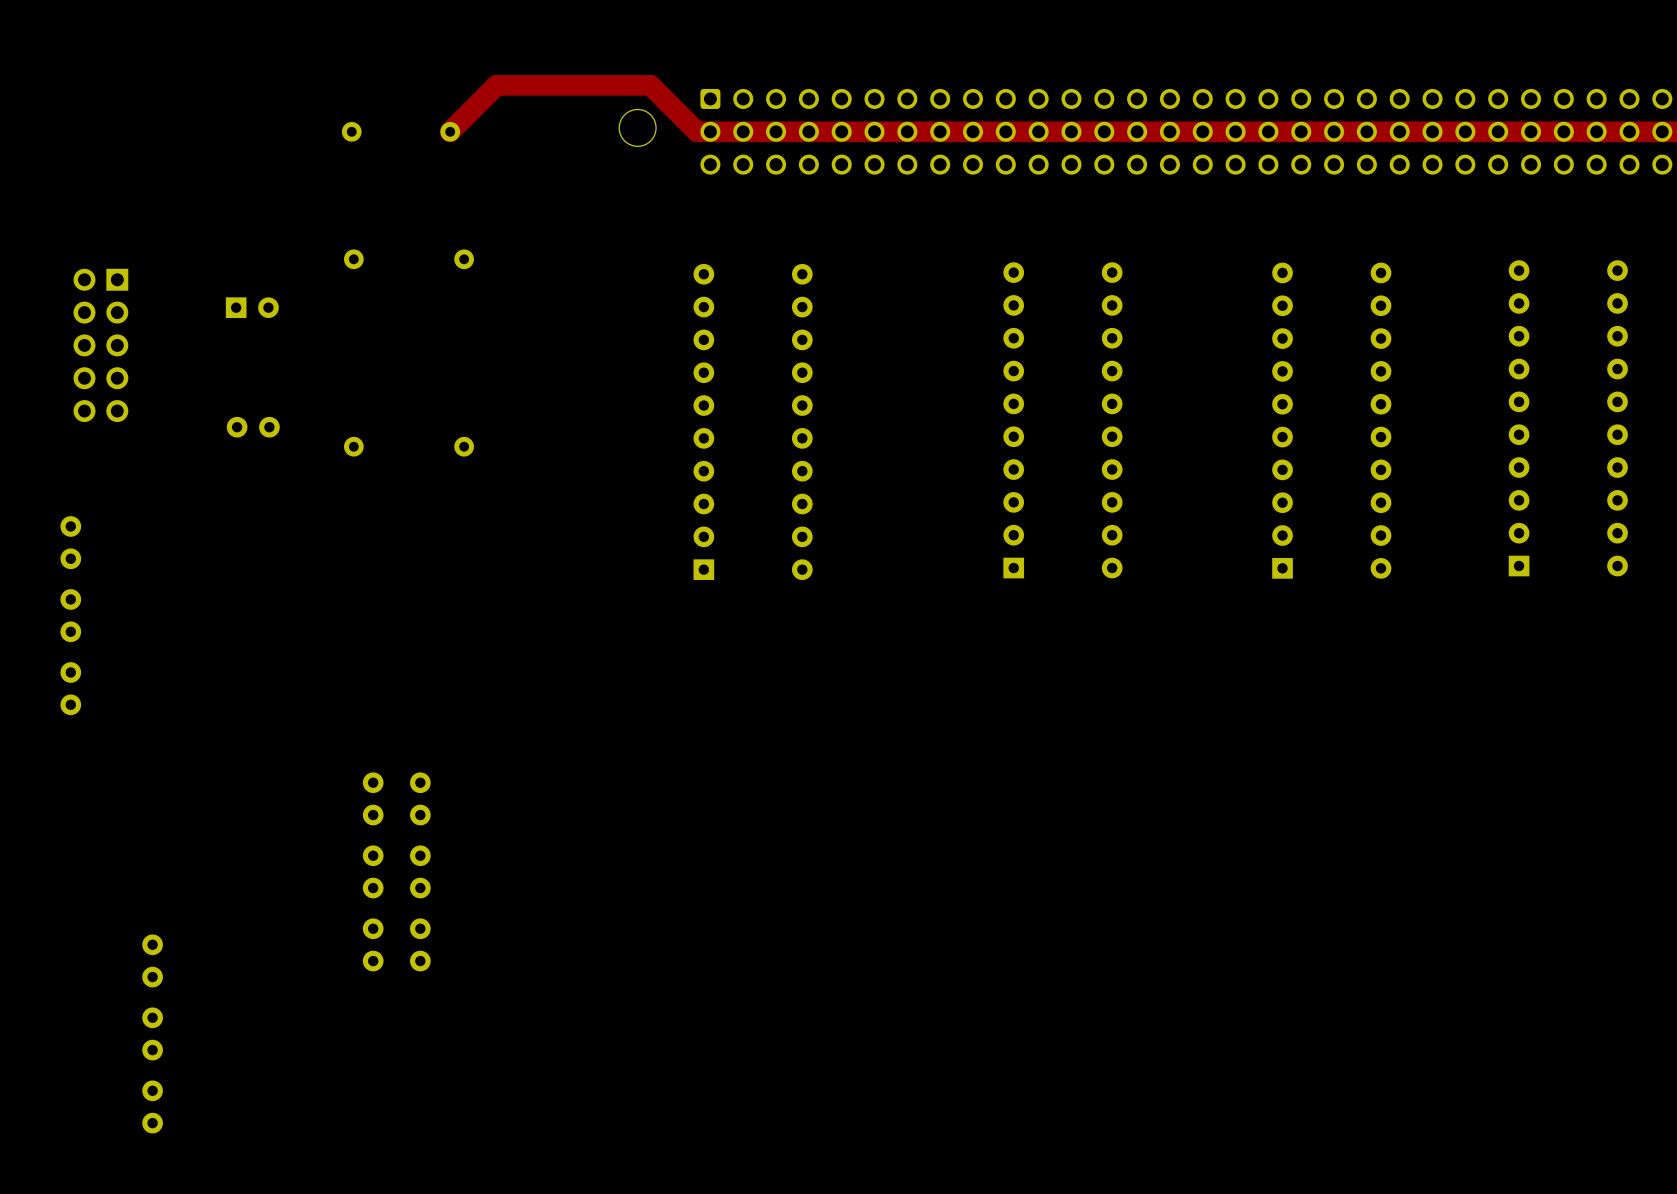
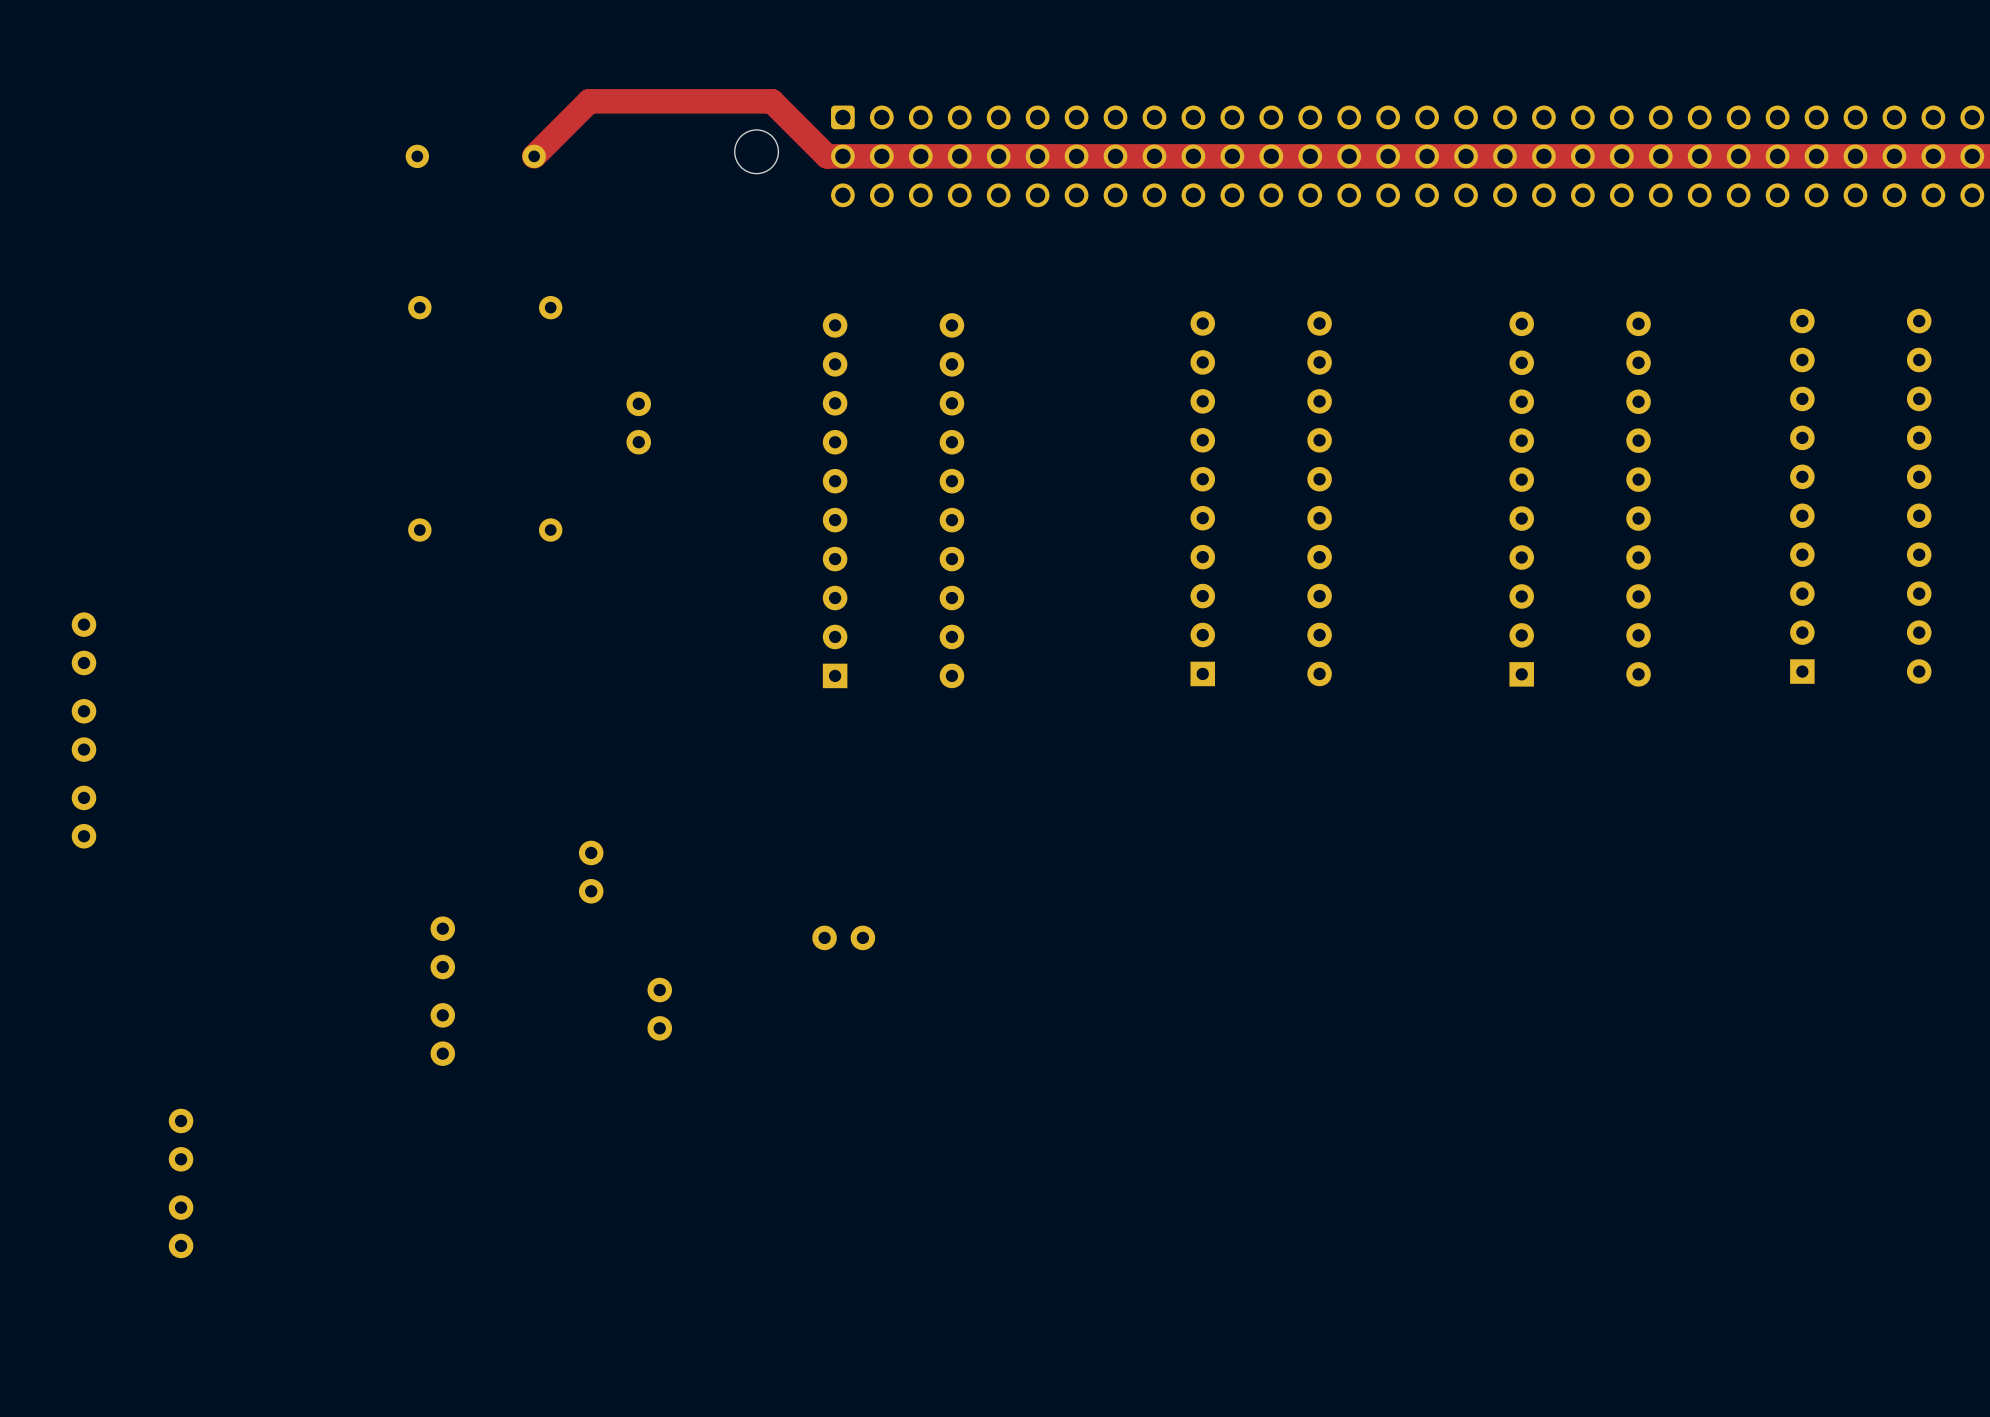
part: (252, 307) -> none
part: (100, 345) -> none
part: none -> (638, 423)
part: (253, 427) -> none
part: none -> (591, 872)
part: none -> (843, 937)
part: (420, 798) -> none
part: none -> (659, 1009)
part: (420, 871) -> none
part: (373, 944) -> none
part: (420, 944) -> none
part: (152, 1106) -> none

